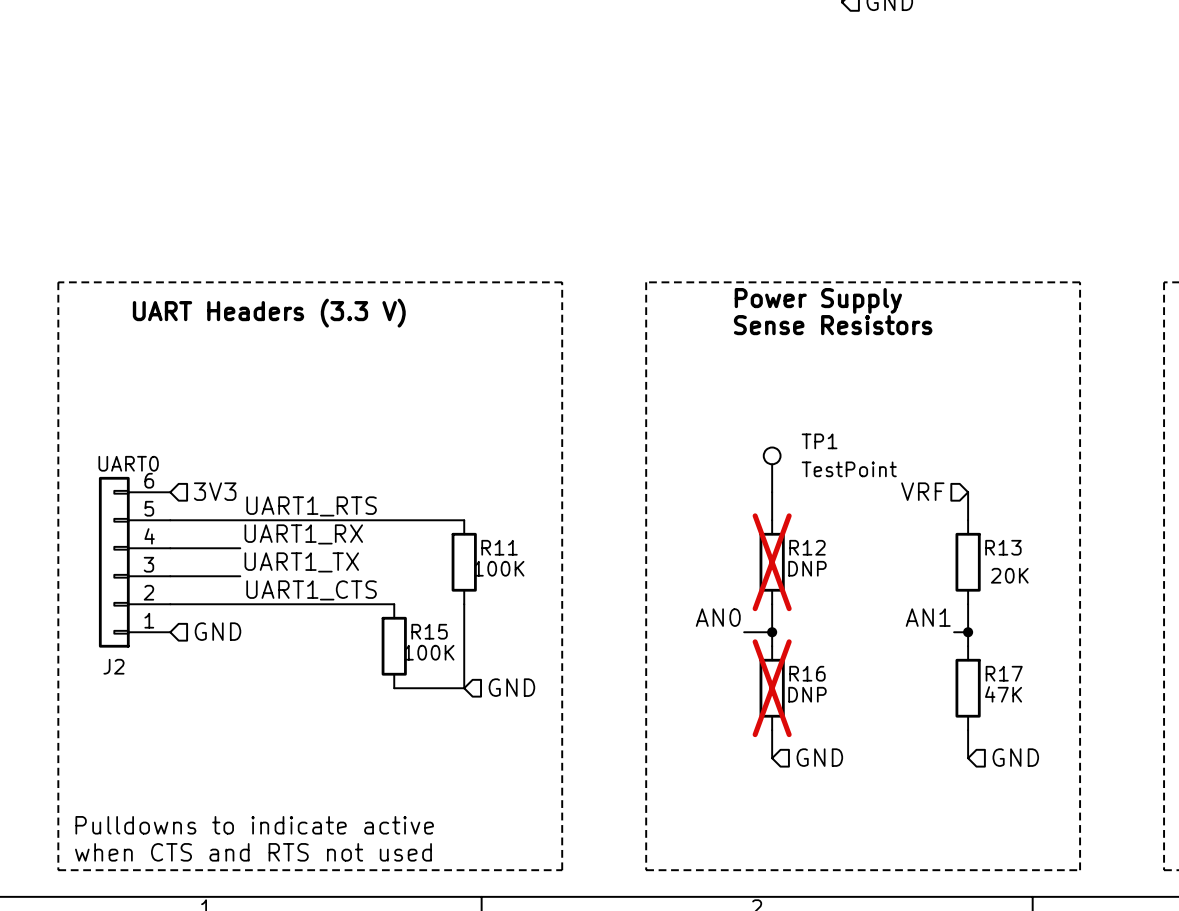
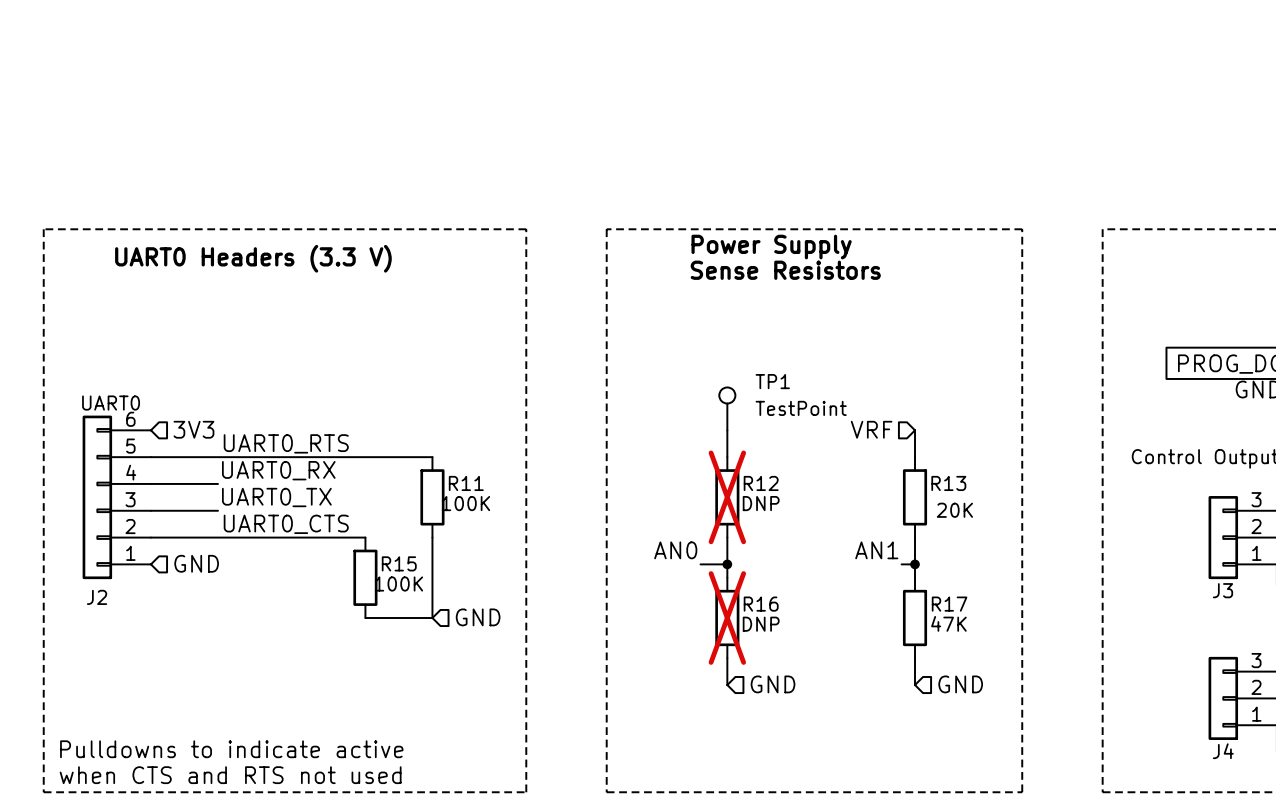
text: UART Headers (3.3 V) (269, 313) -> UART0 Headers (3.3 V) (253, 258)
label: UART1_RTS (311, 506) -> UART0_RTS (286, 443)
label: UART1_RX (303, 534) -> UART0_RX (278, 470)
label: UART1_TX (301, 562) -> UART0_TX (276, 497)
label: UART1_CTS (311, 590) -> UART0_CTS (286, 524)

